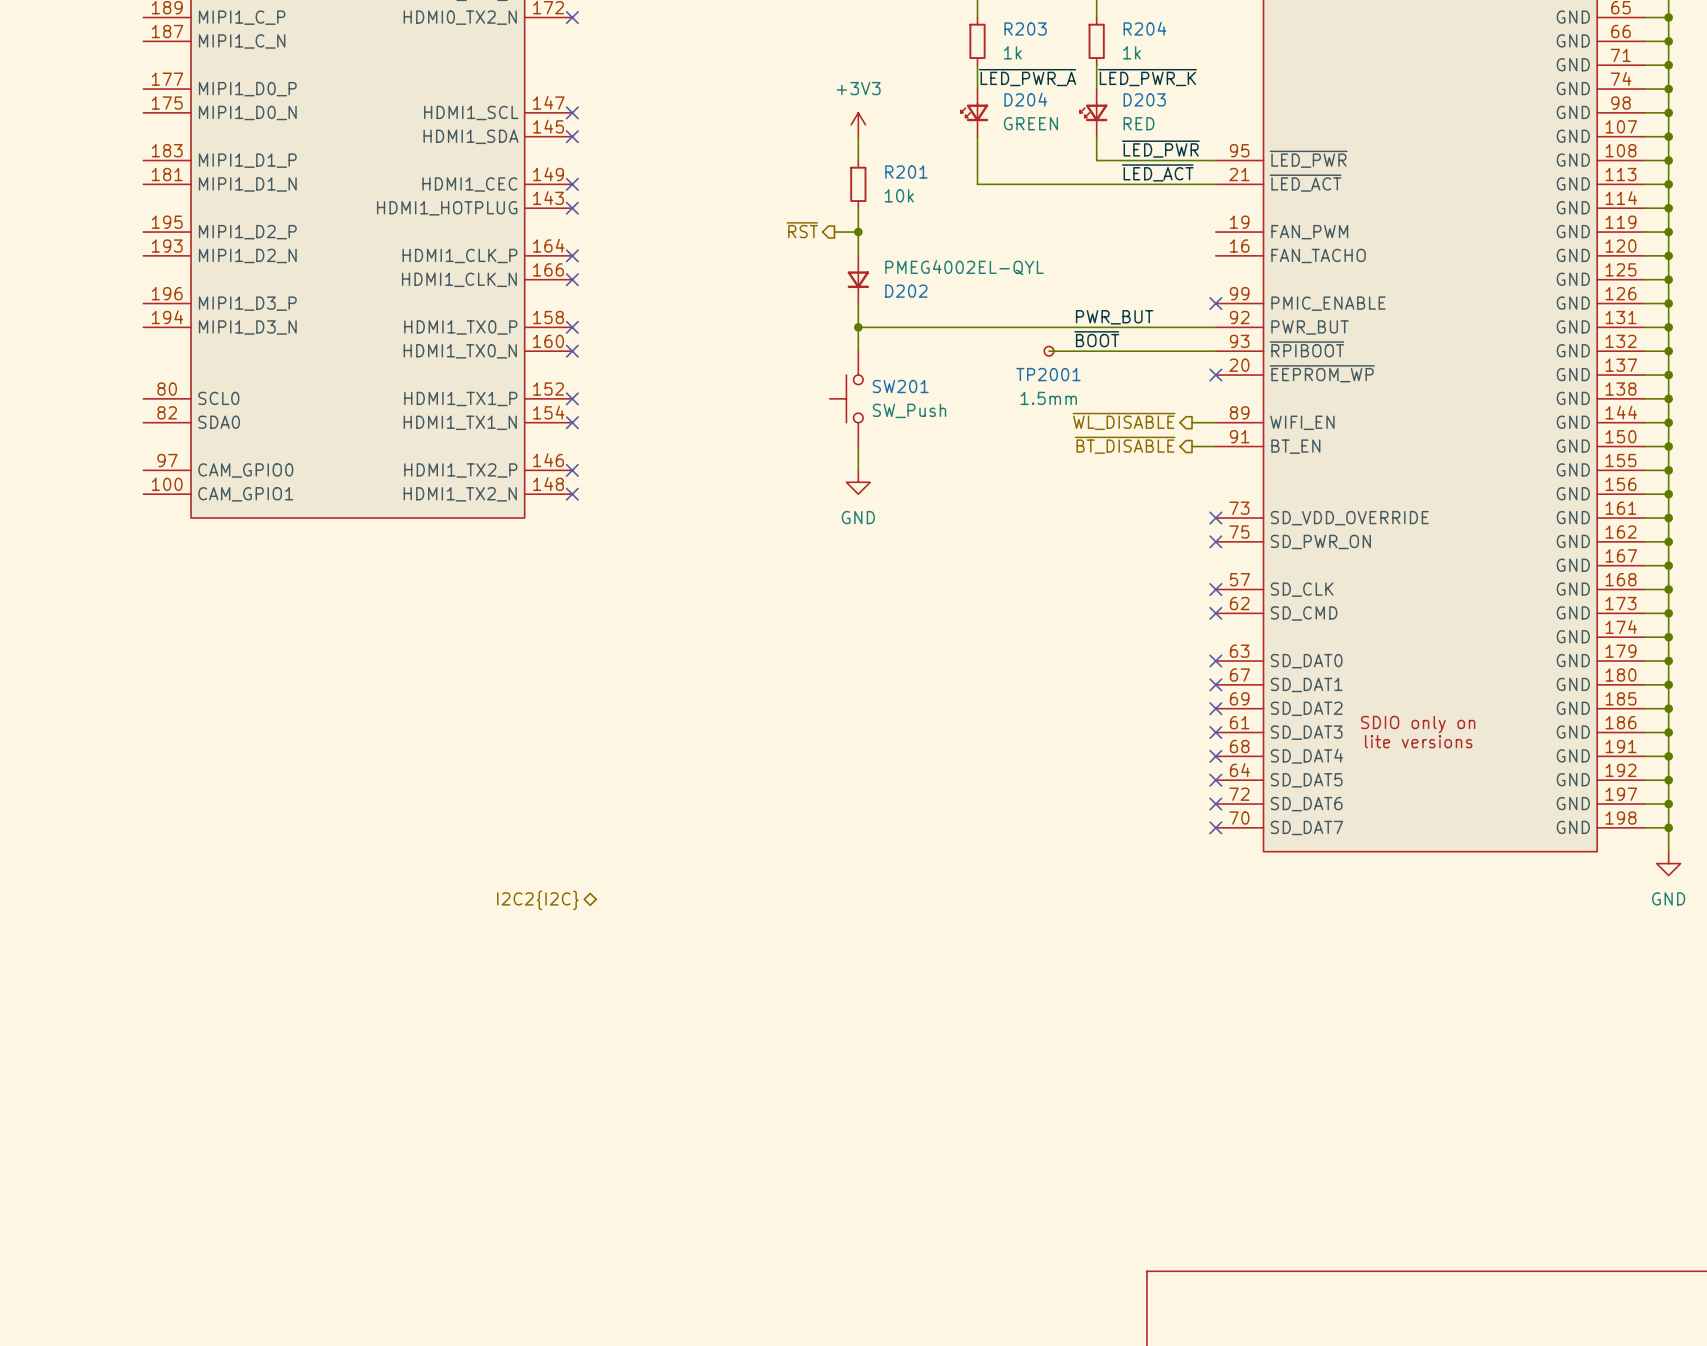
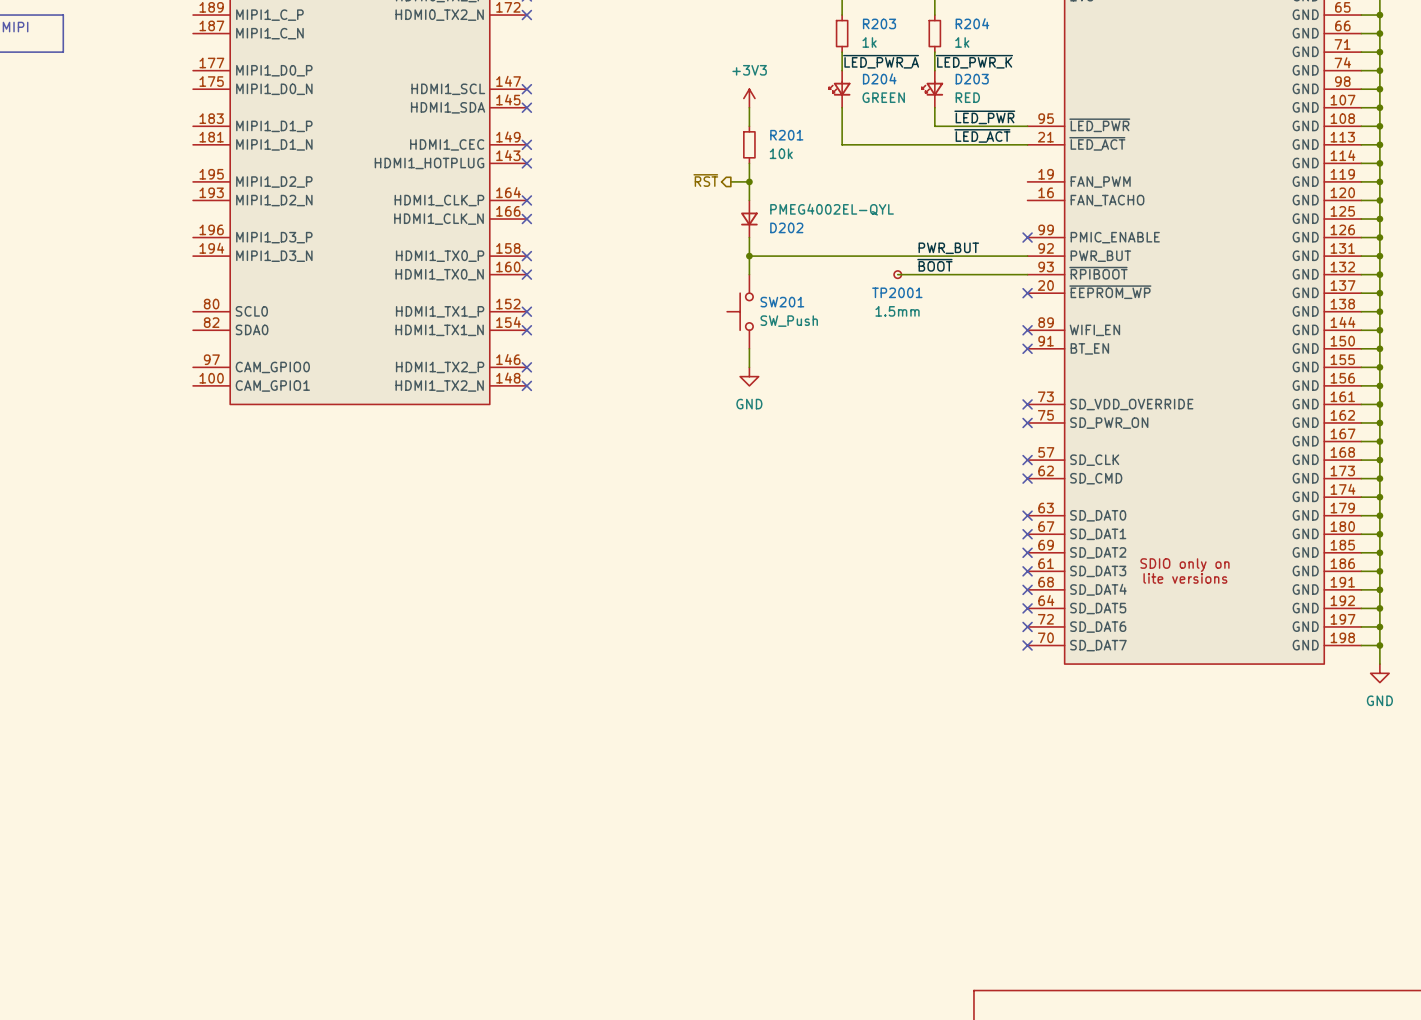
hierarchical label: ~{WL_DISABLE} (1124, 421) -> none
wire: (1192, 422) (1215, 422) -> none
no-connect mark: none -> (1027, 330)
hierarchical label: ~{BT_DISABLE} (1125, 445) -> none
wire: (1192, 446) (1215, 446) -> none
no-connect mark: none -> (1027, 348)
hierarchical label: I2C2{I2C} (537, 900) -> none

